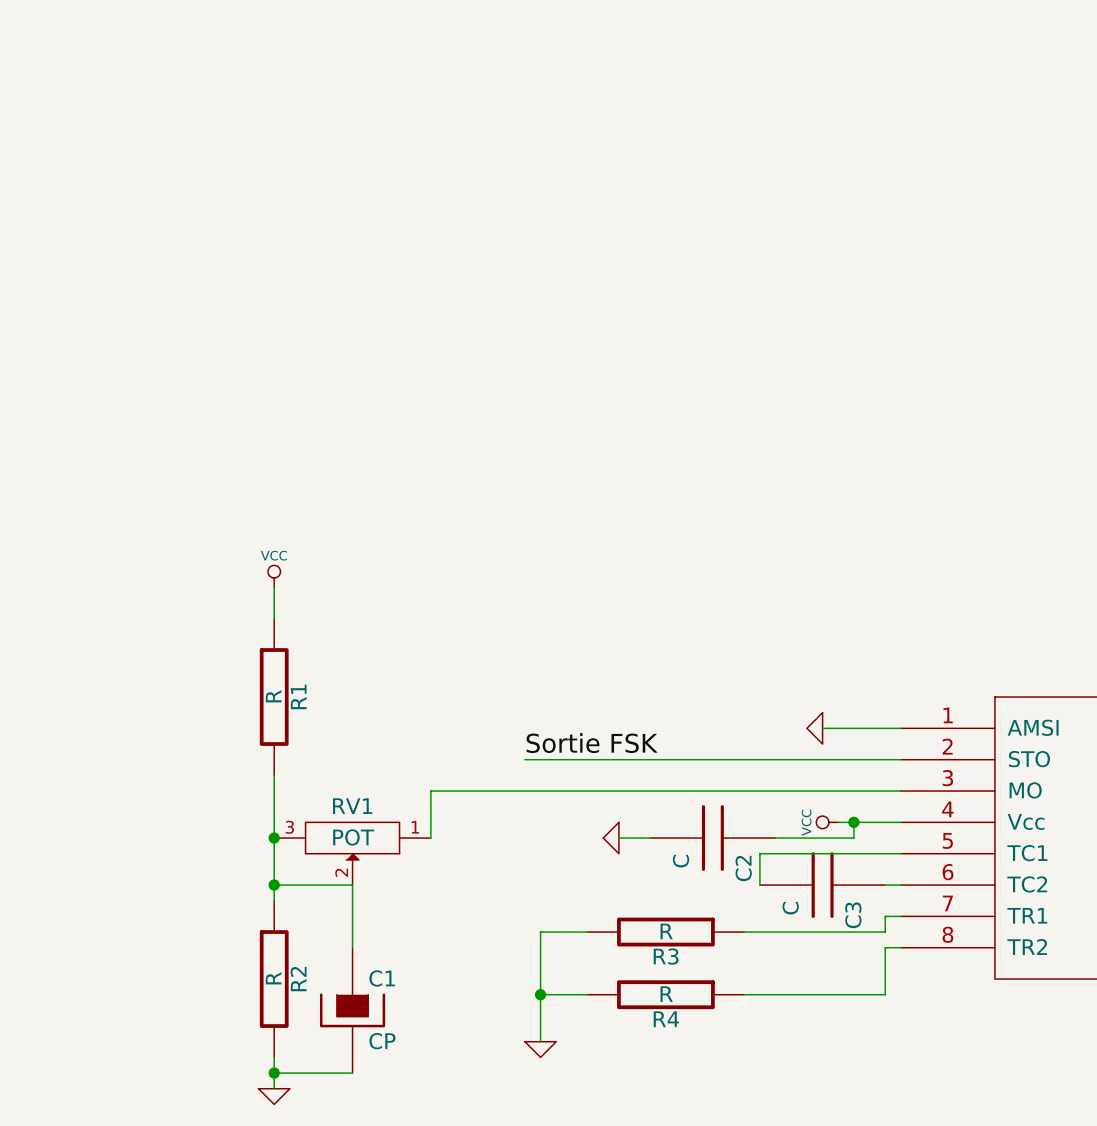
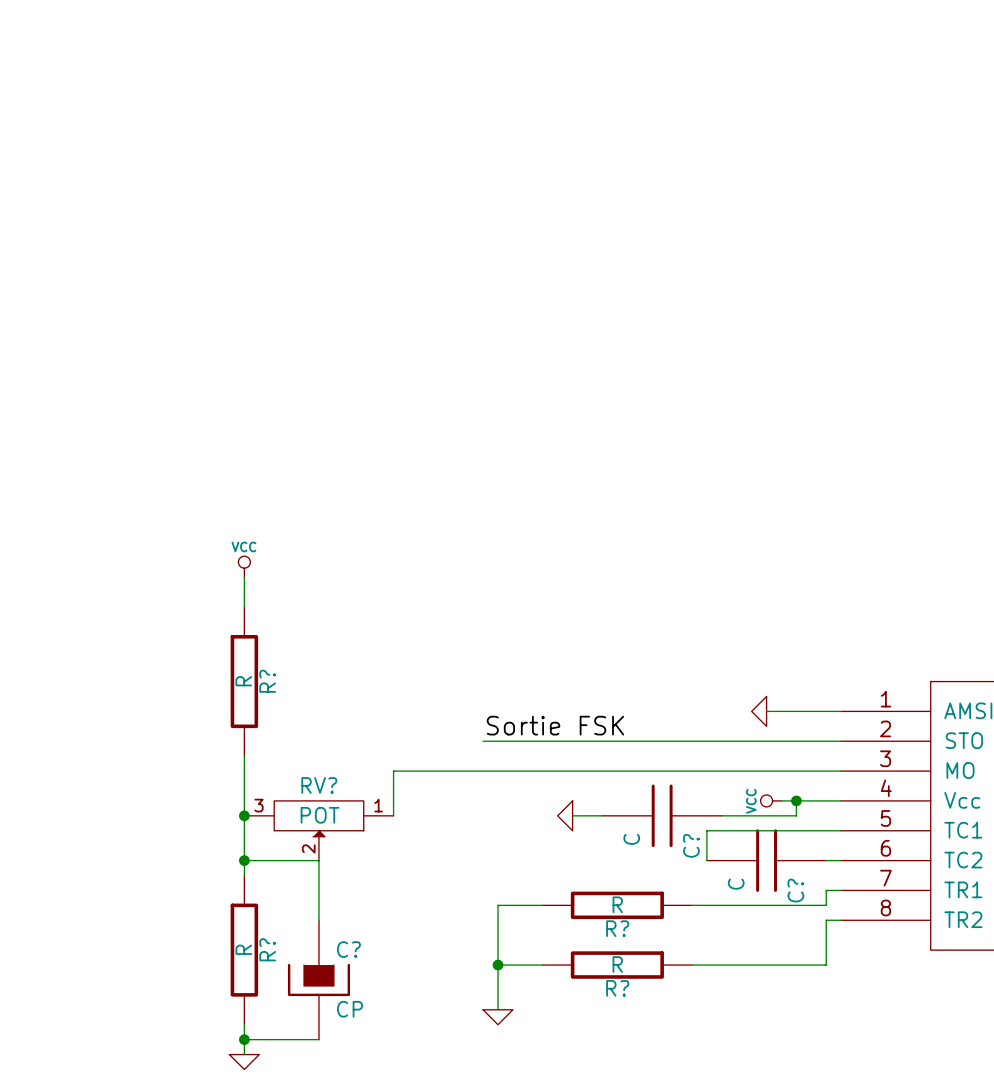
R1 name: R1 (298, 696) -> R? (267, 681)
RV1 name: RV1 (352, 806) -> RV? (319, 785)
C2 name: C2 (743, 868) -> C? (691, 845)
C3 name: C3 (853, 915) -> C? (795, 890)
R3 name: R3 (666, 956) -> R? (617, 928)
C1 name: C1 (382, 978) -> C? (348, 949)
R2 name: R2 (298, 979) -> R? (267, 949)
R4 name: R4 (666, 1019) -> R? (617, 988)

